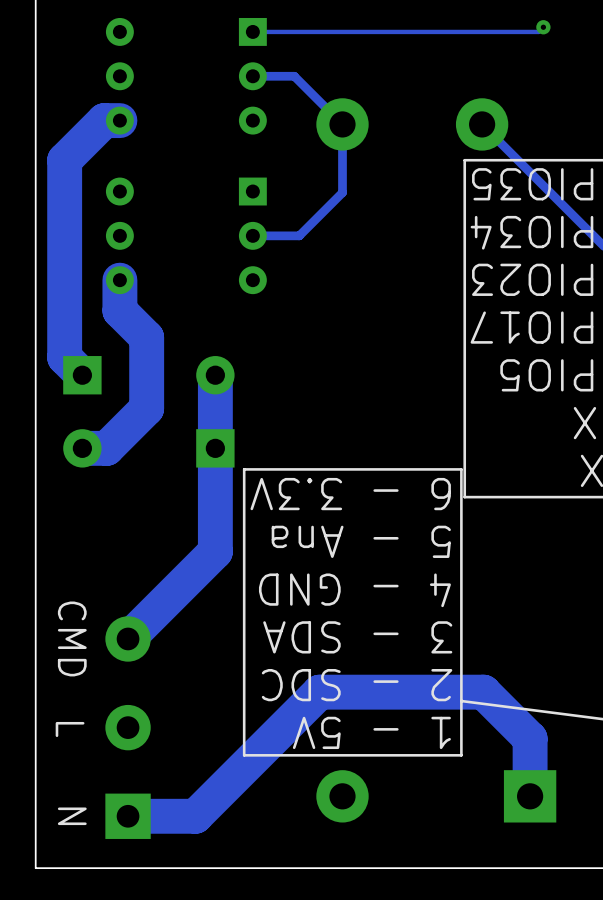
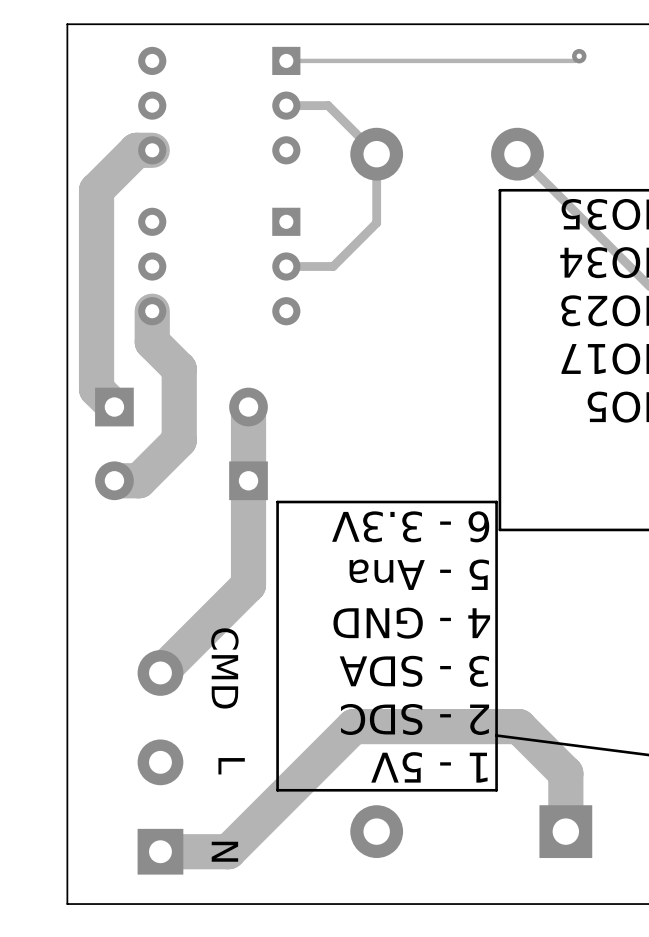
text position: CMD (72, 638) -> CMD (224, 668)
text position: L (70, 729) -> L (231, 766)
text position: N (72, 816) -> N (224, 851)

